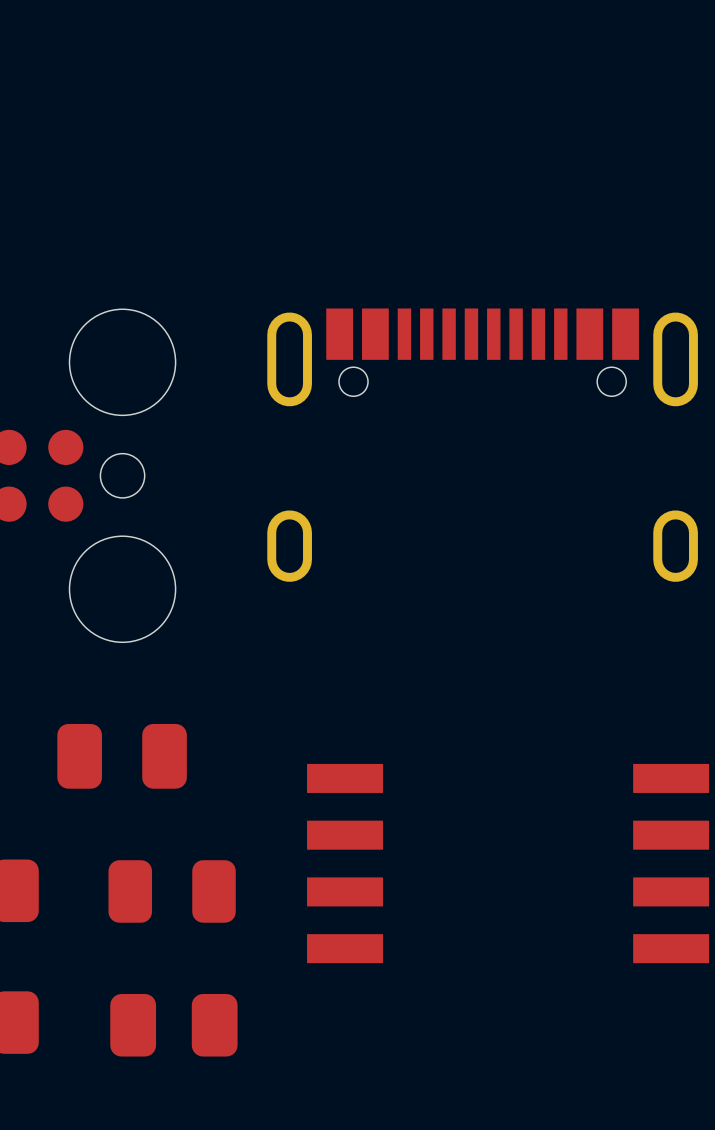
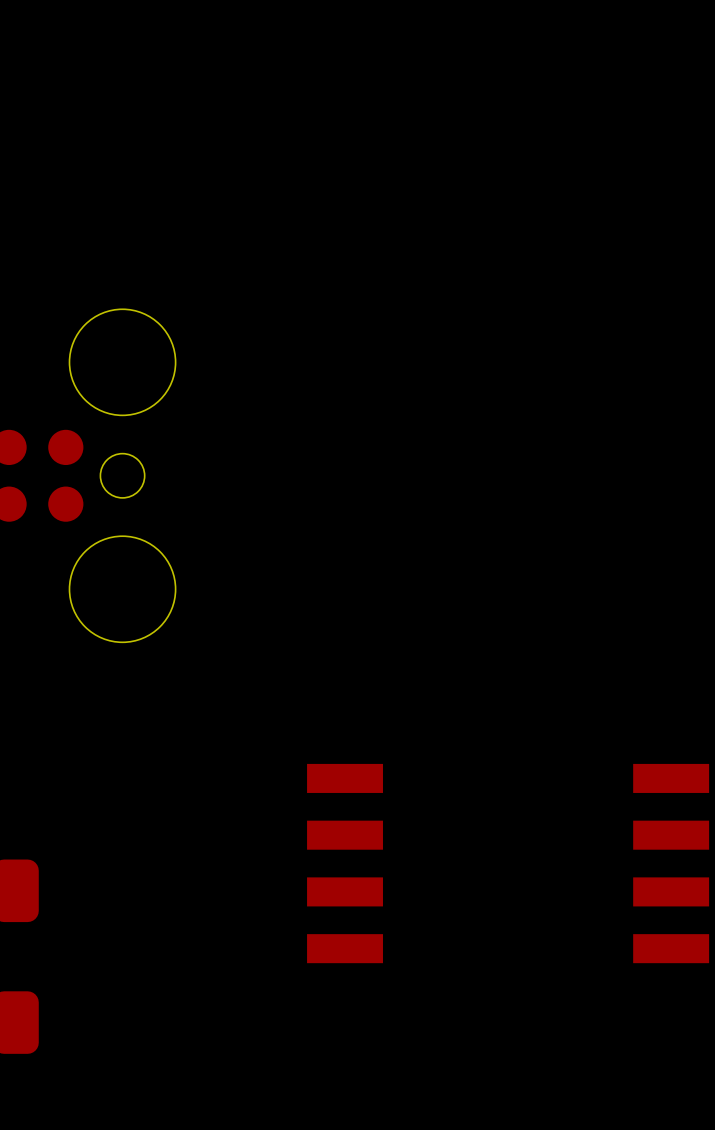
part: (482, 445) -> none
part: (122, 756) -> none
part: (172, 891) -> none
part: (173, 1025) -> none

